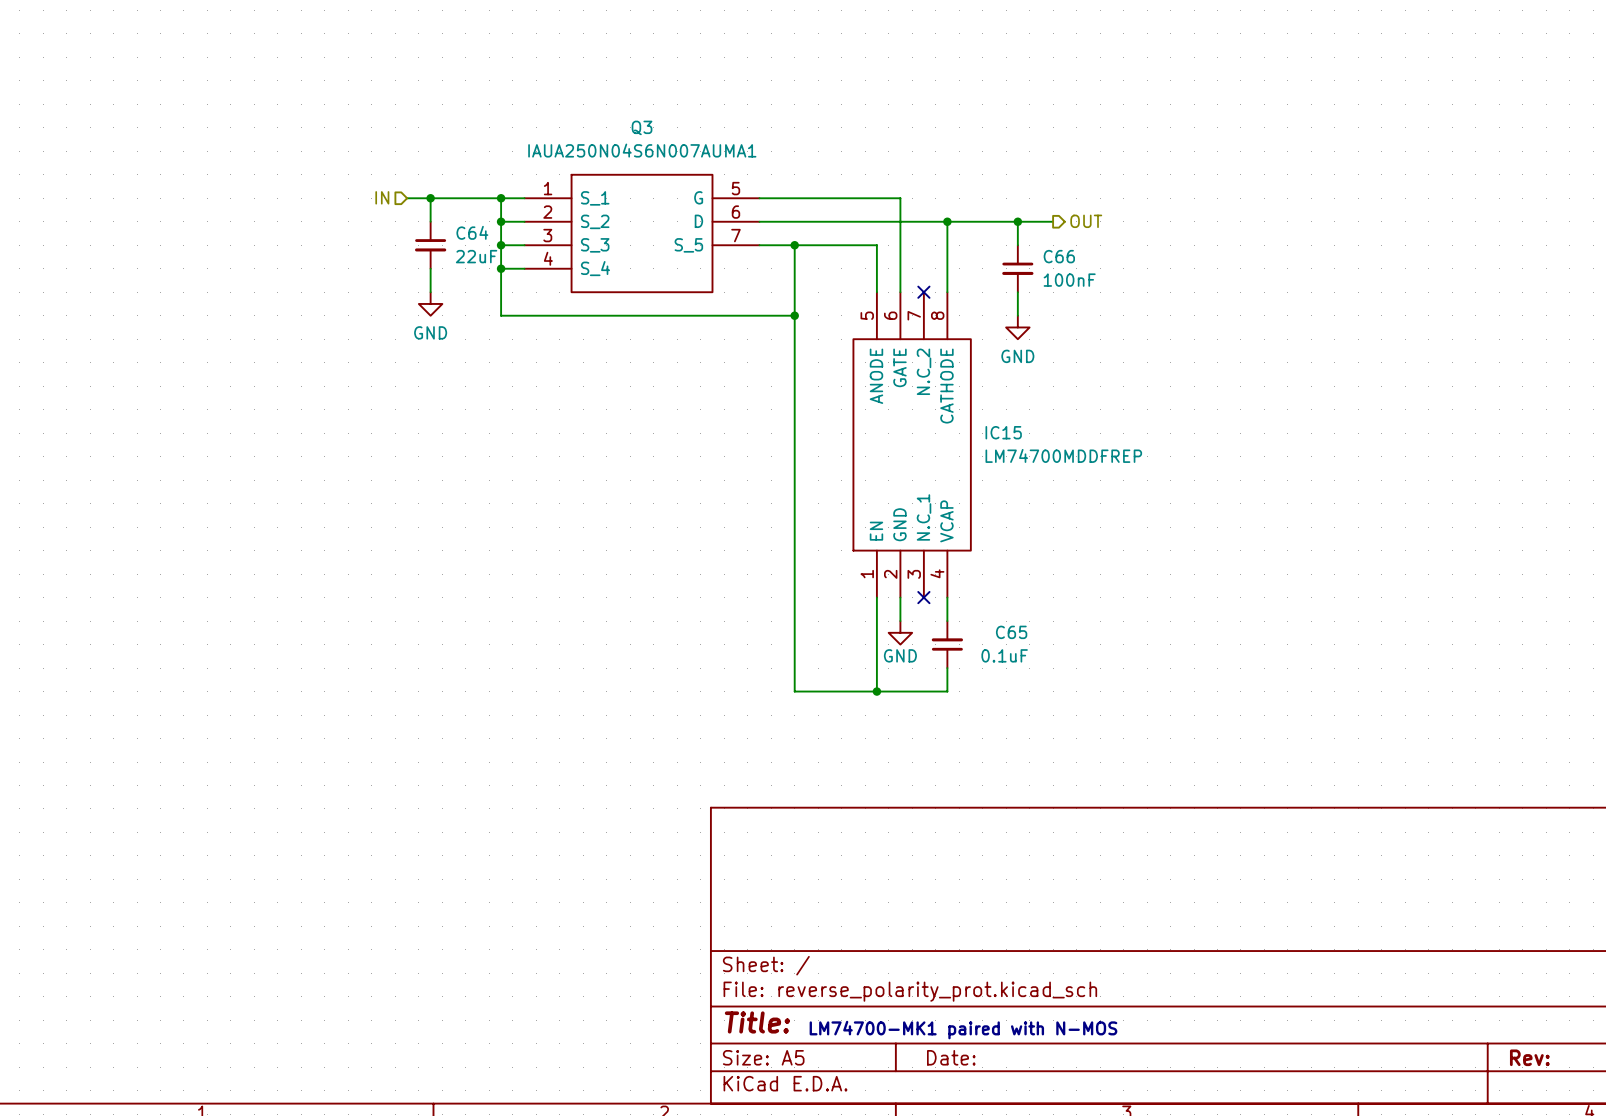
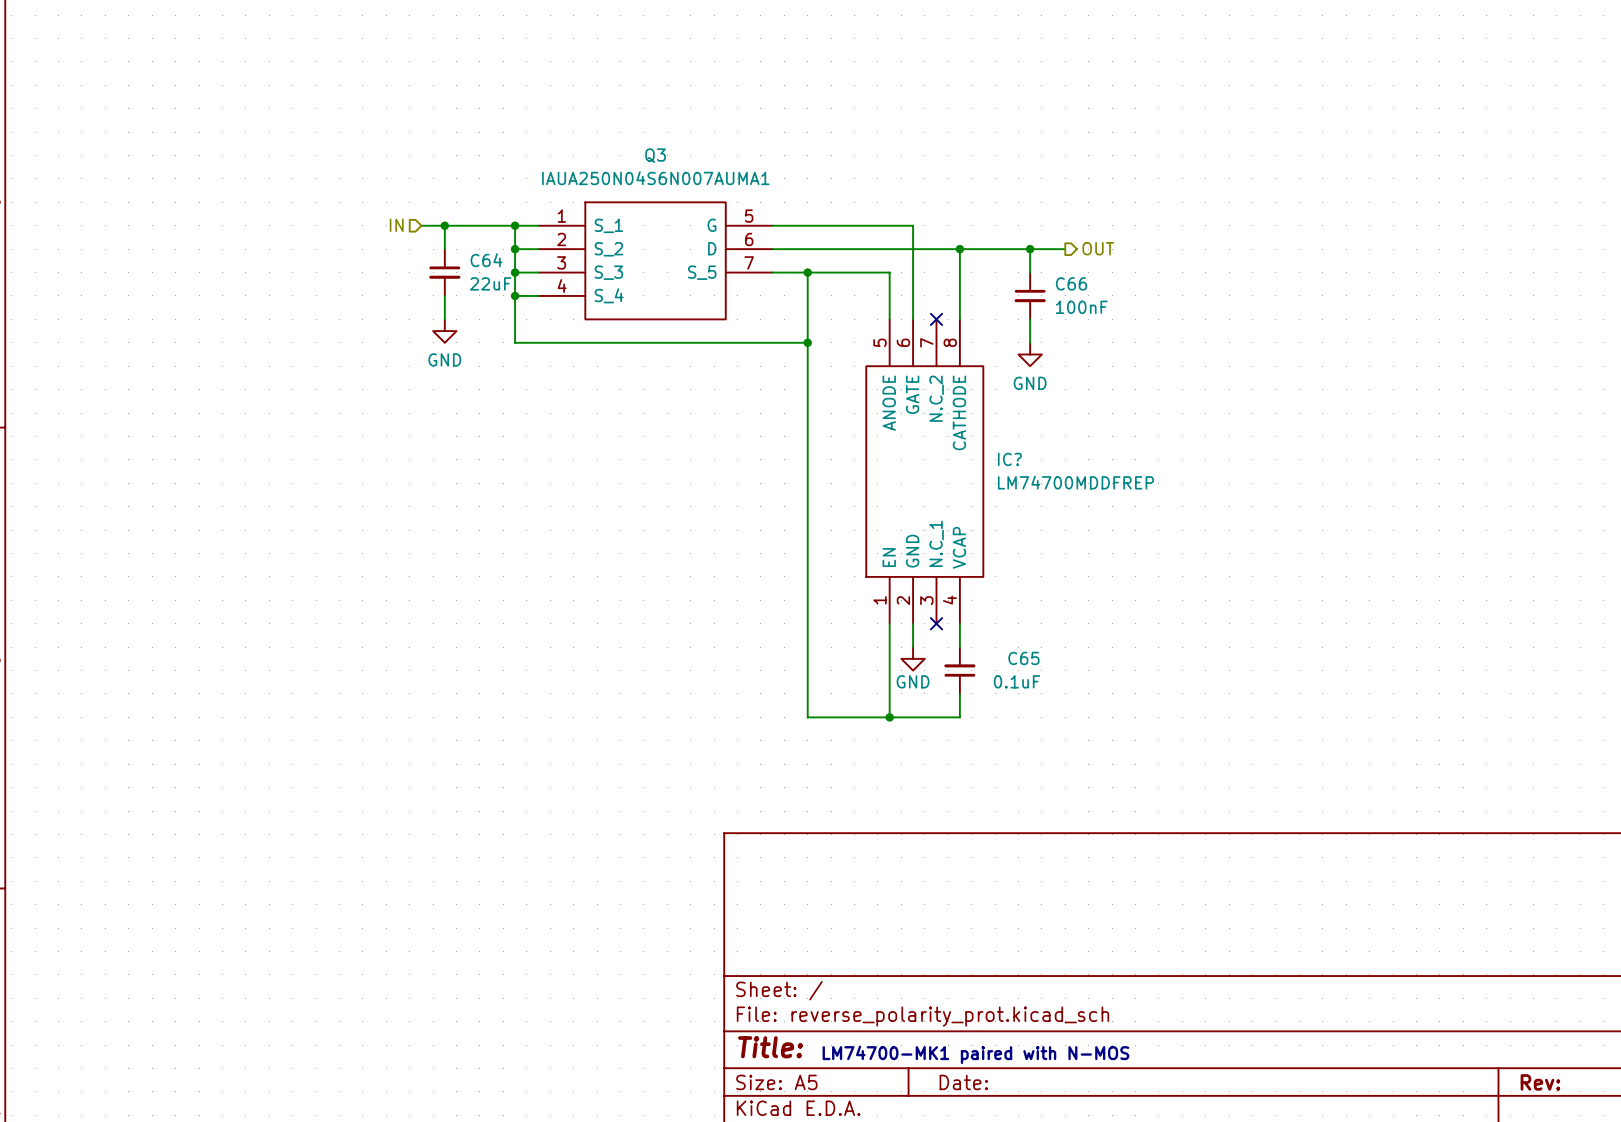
IC15 name: IC15 (1003, 432) -> IC? (1009, 459)

